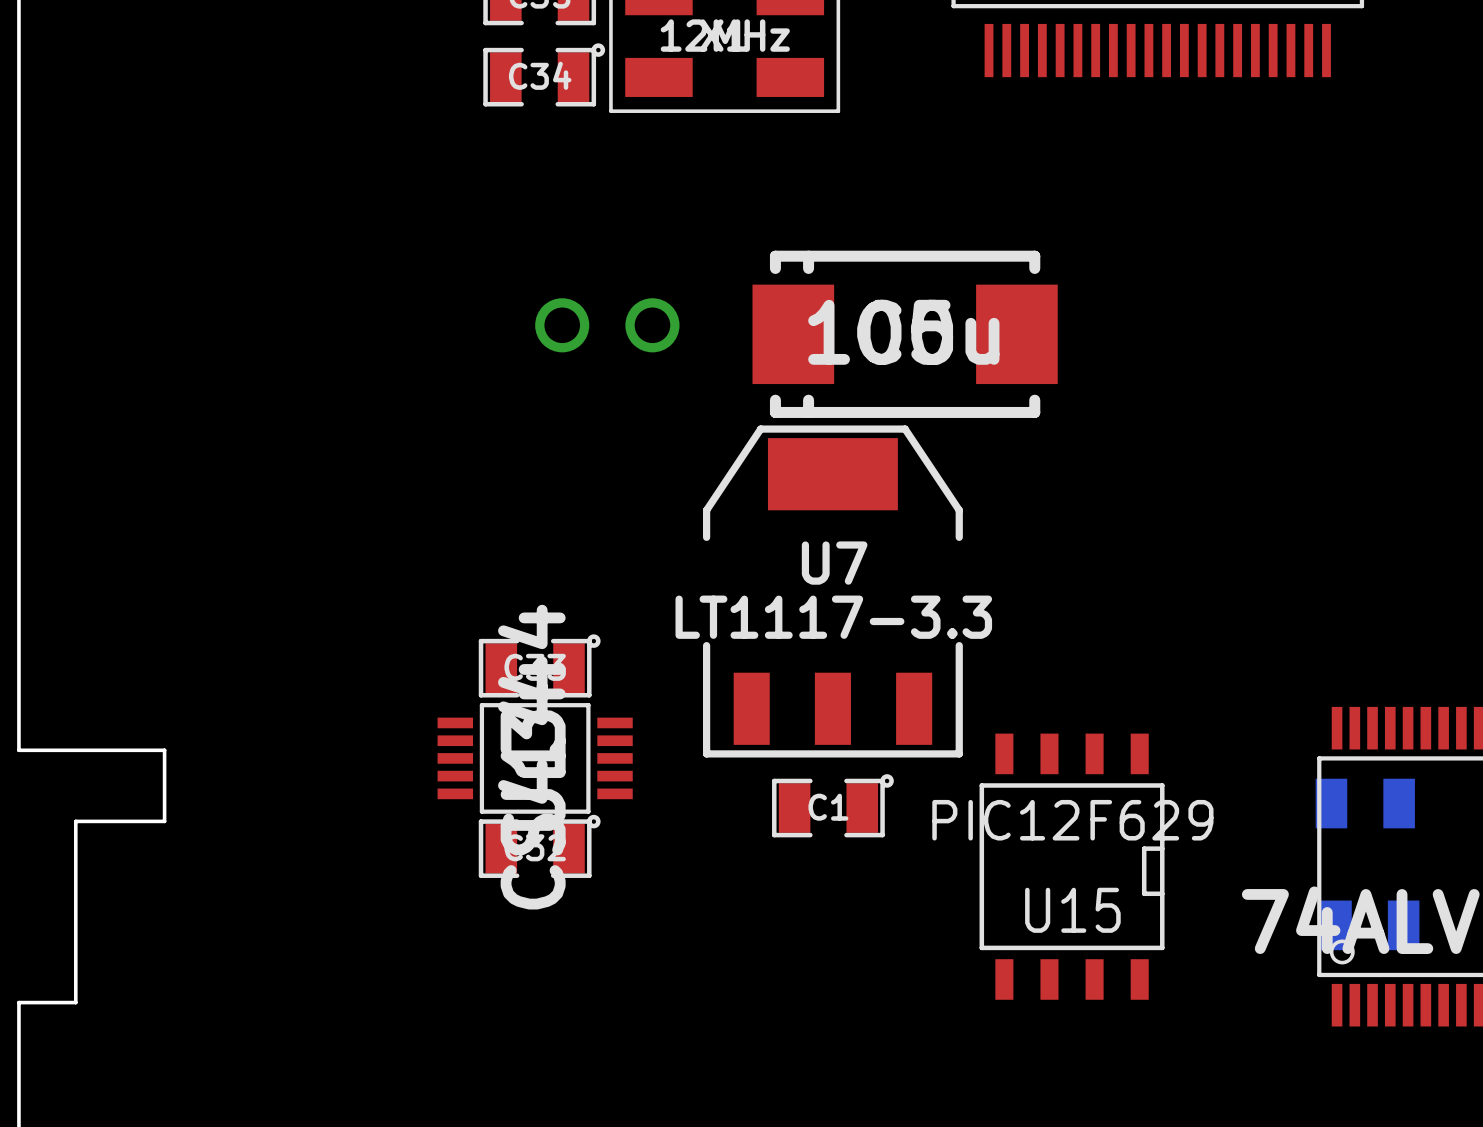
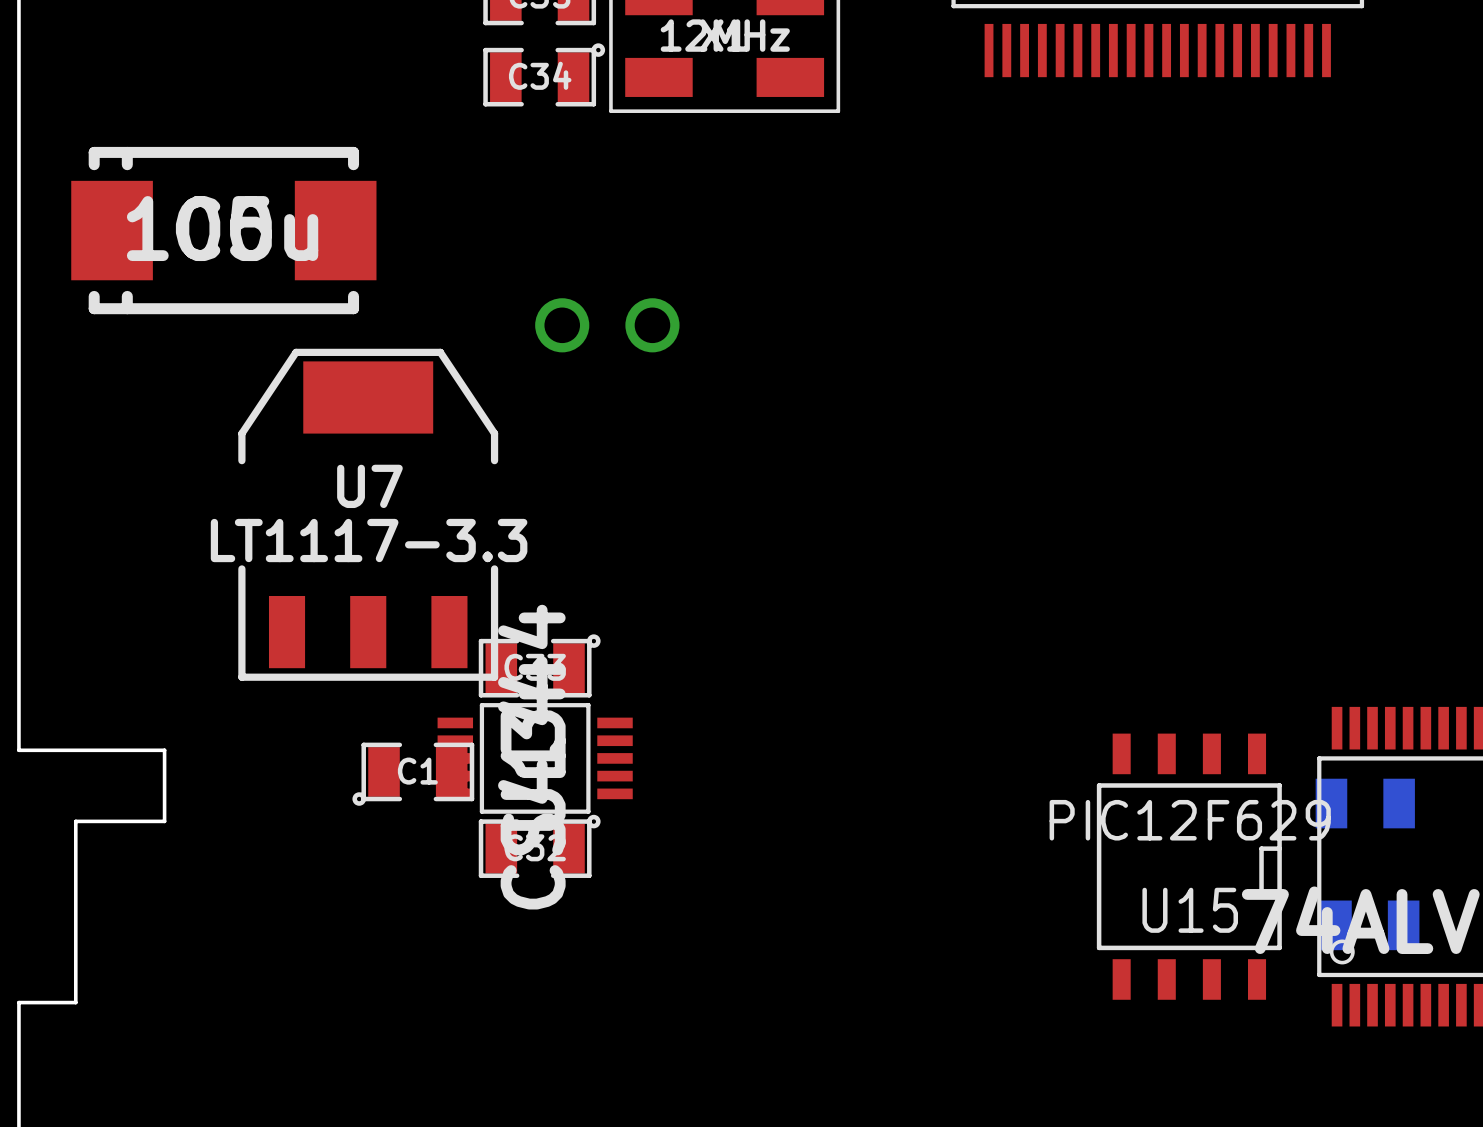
part position: (905, 334) -> (223, 230)
U7 position: (832, 591) -> (368, 514)
C1 rotation: 0° (832, 805) -> 180° (413, 774)
C1 position: (832, 805) -> (413, 774)
U15 position: (1072, 866) -> (1189, 866)

